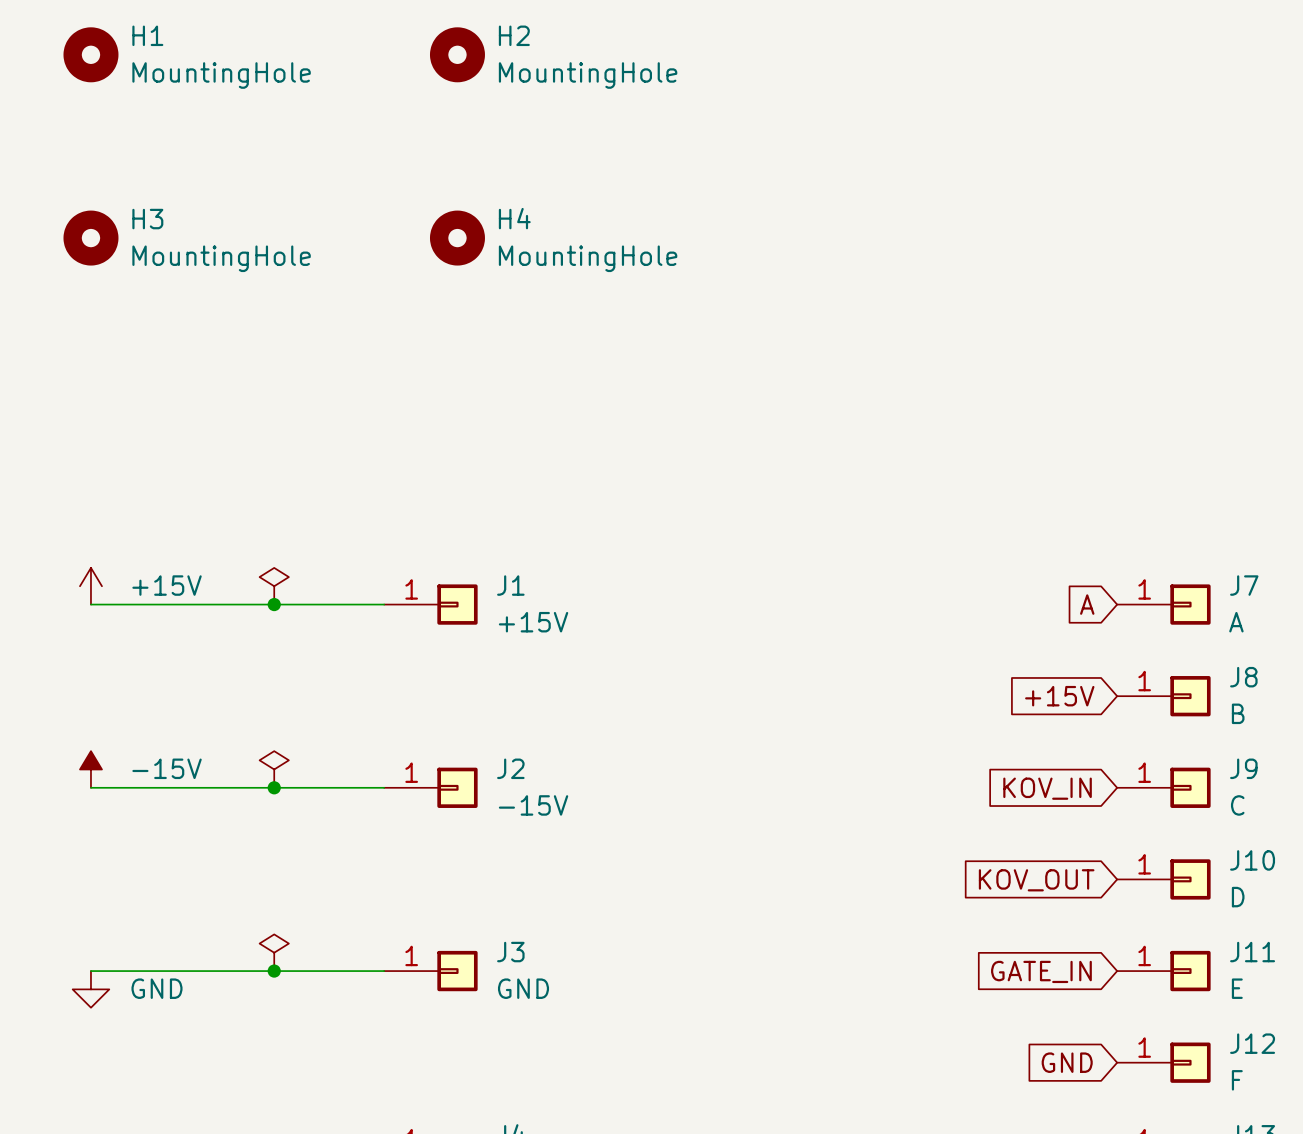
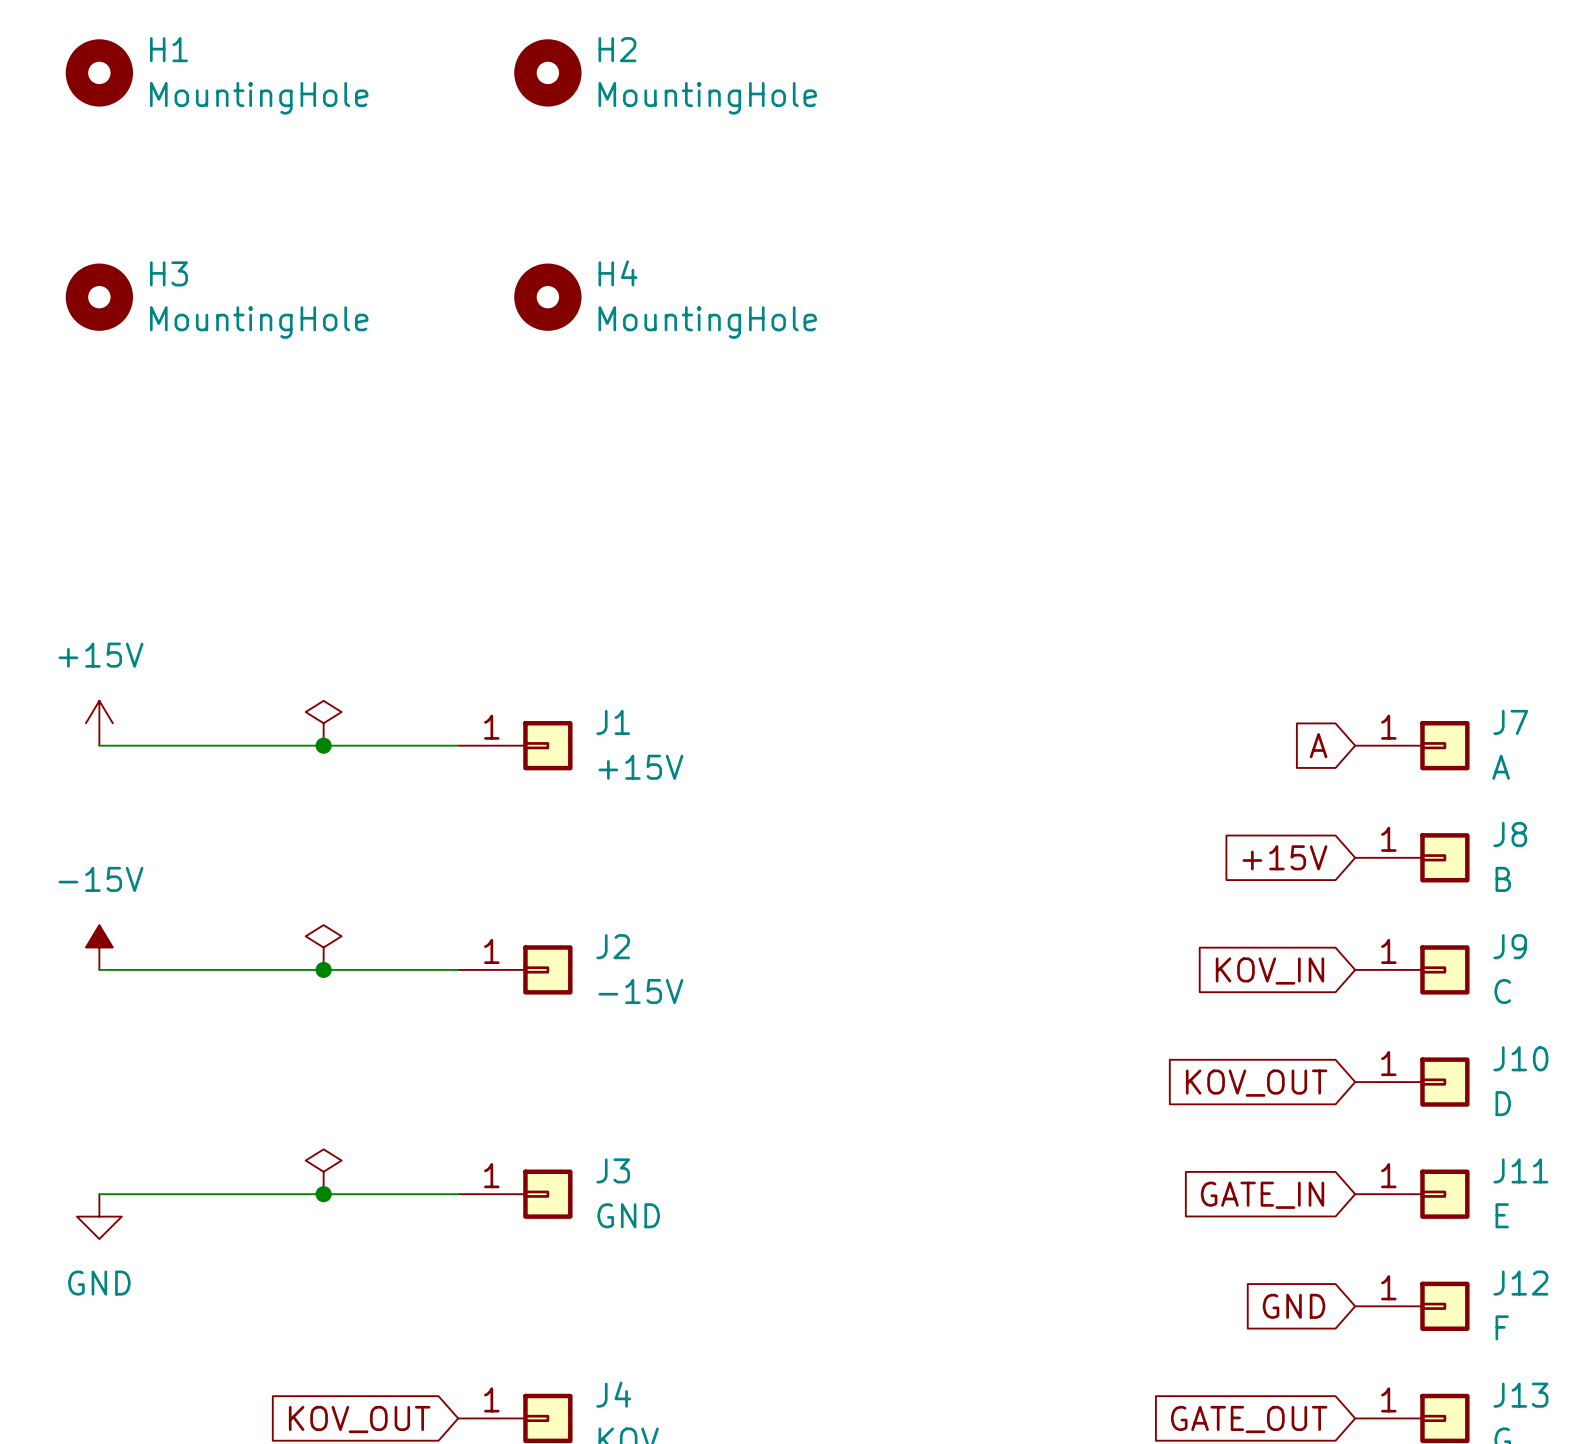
power symbol text position: +15V (167, 585) -> +15V (100, 655)
power symbol text position: -15V (167, 768) -> -15V (100, 879)
power symbol text position: GND (157, 988) -> GND (99, 1283)

